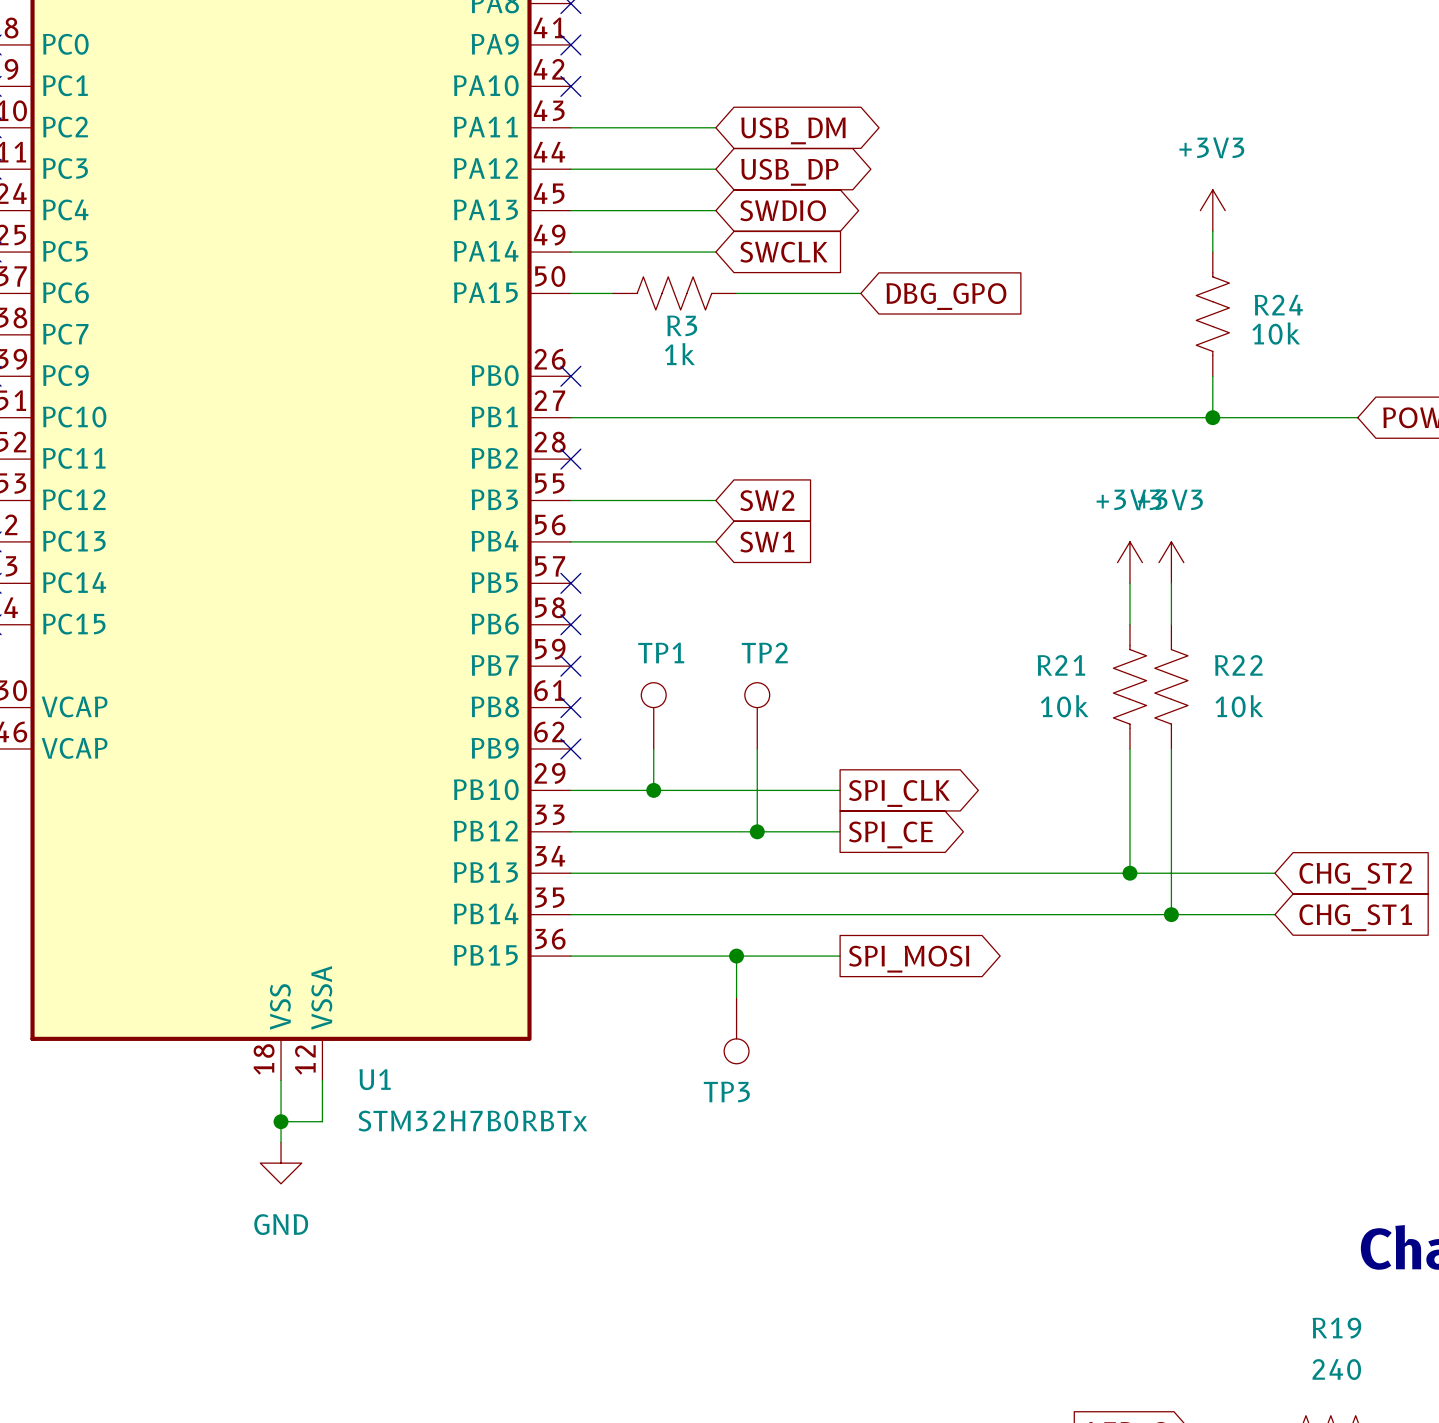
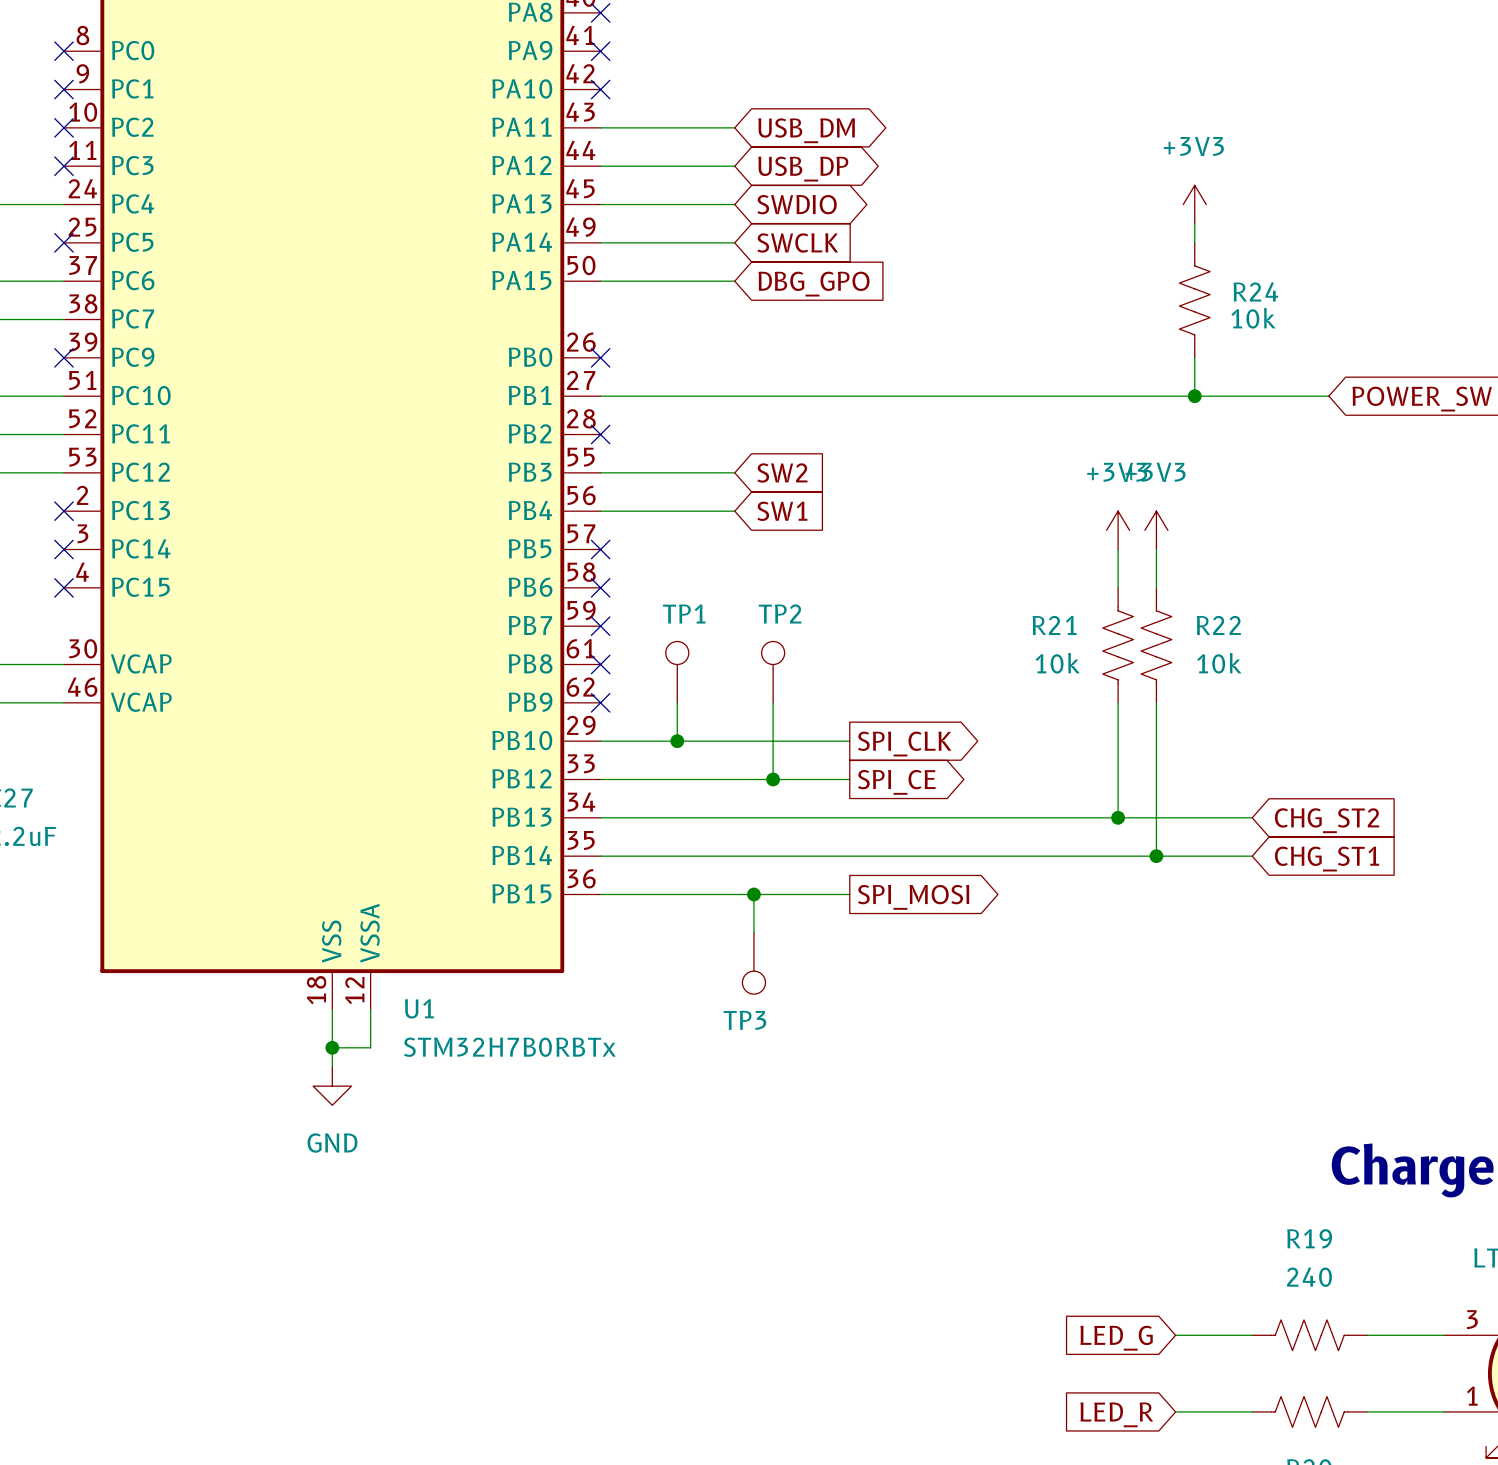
wire: none -> (638, 281) (734, 281)
R3: 1k (674, 293) -> none
wire: (736, 293) (860, 293) -> none
global label position: DBG_GPO (946, 296) -> DBG_GPO (814, 284)

